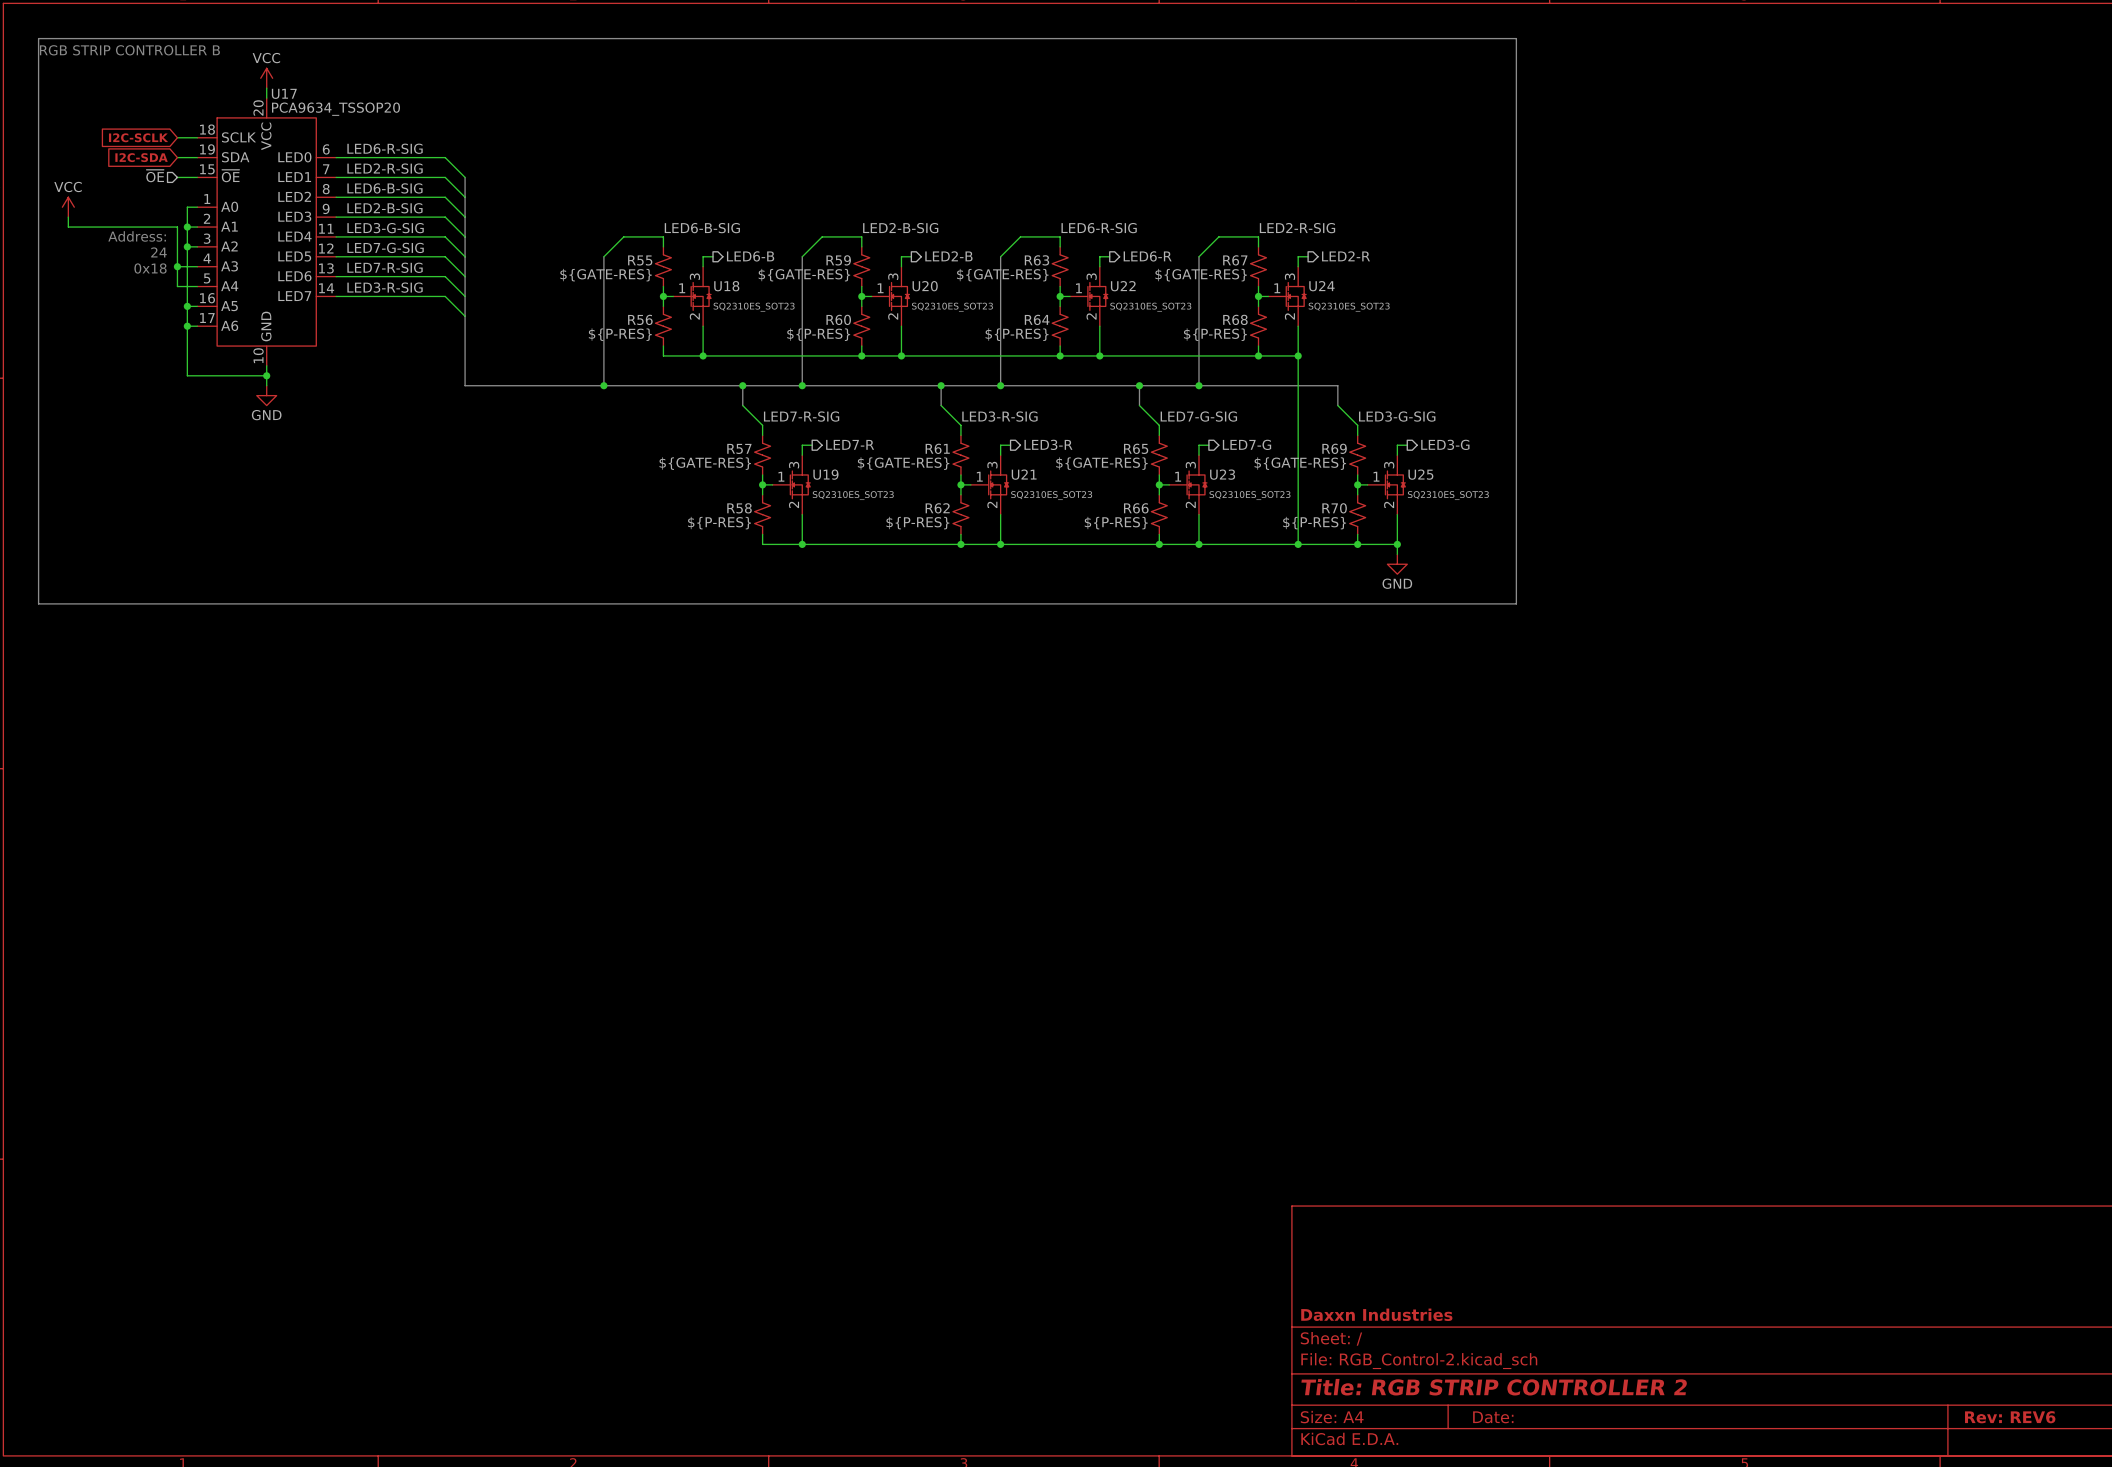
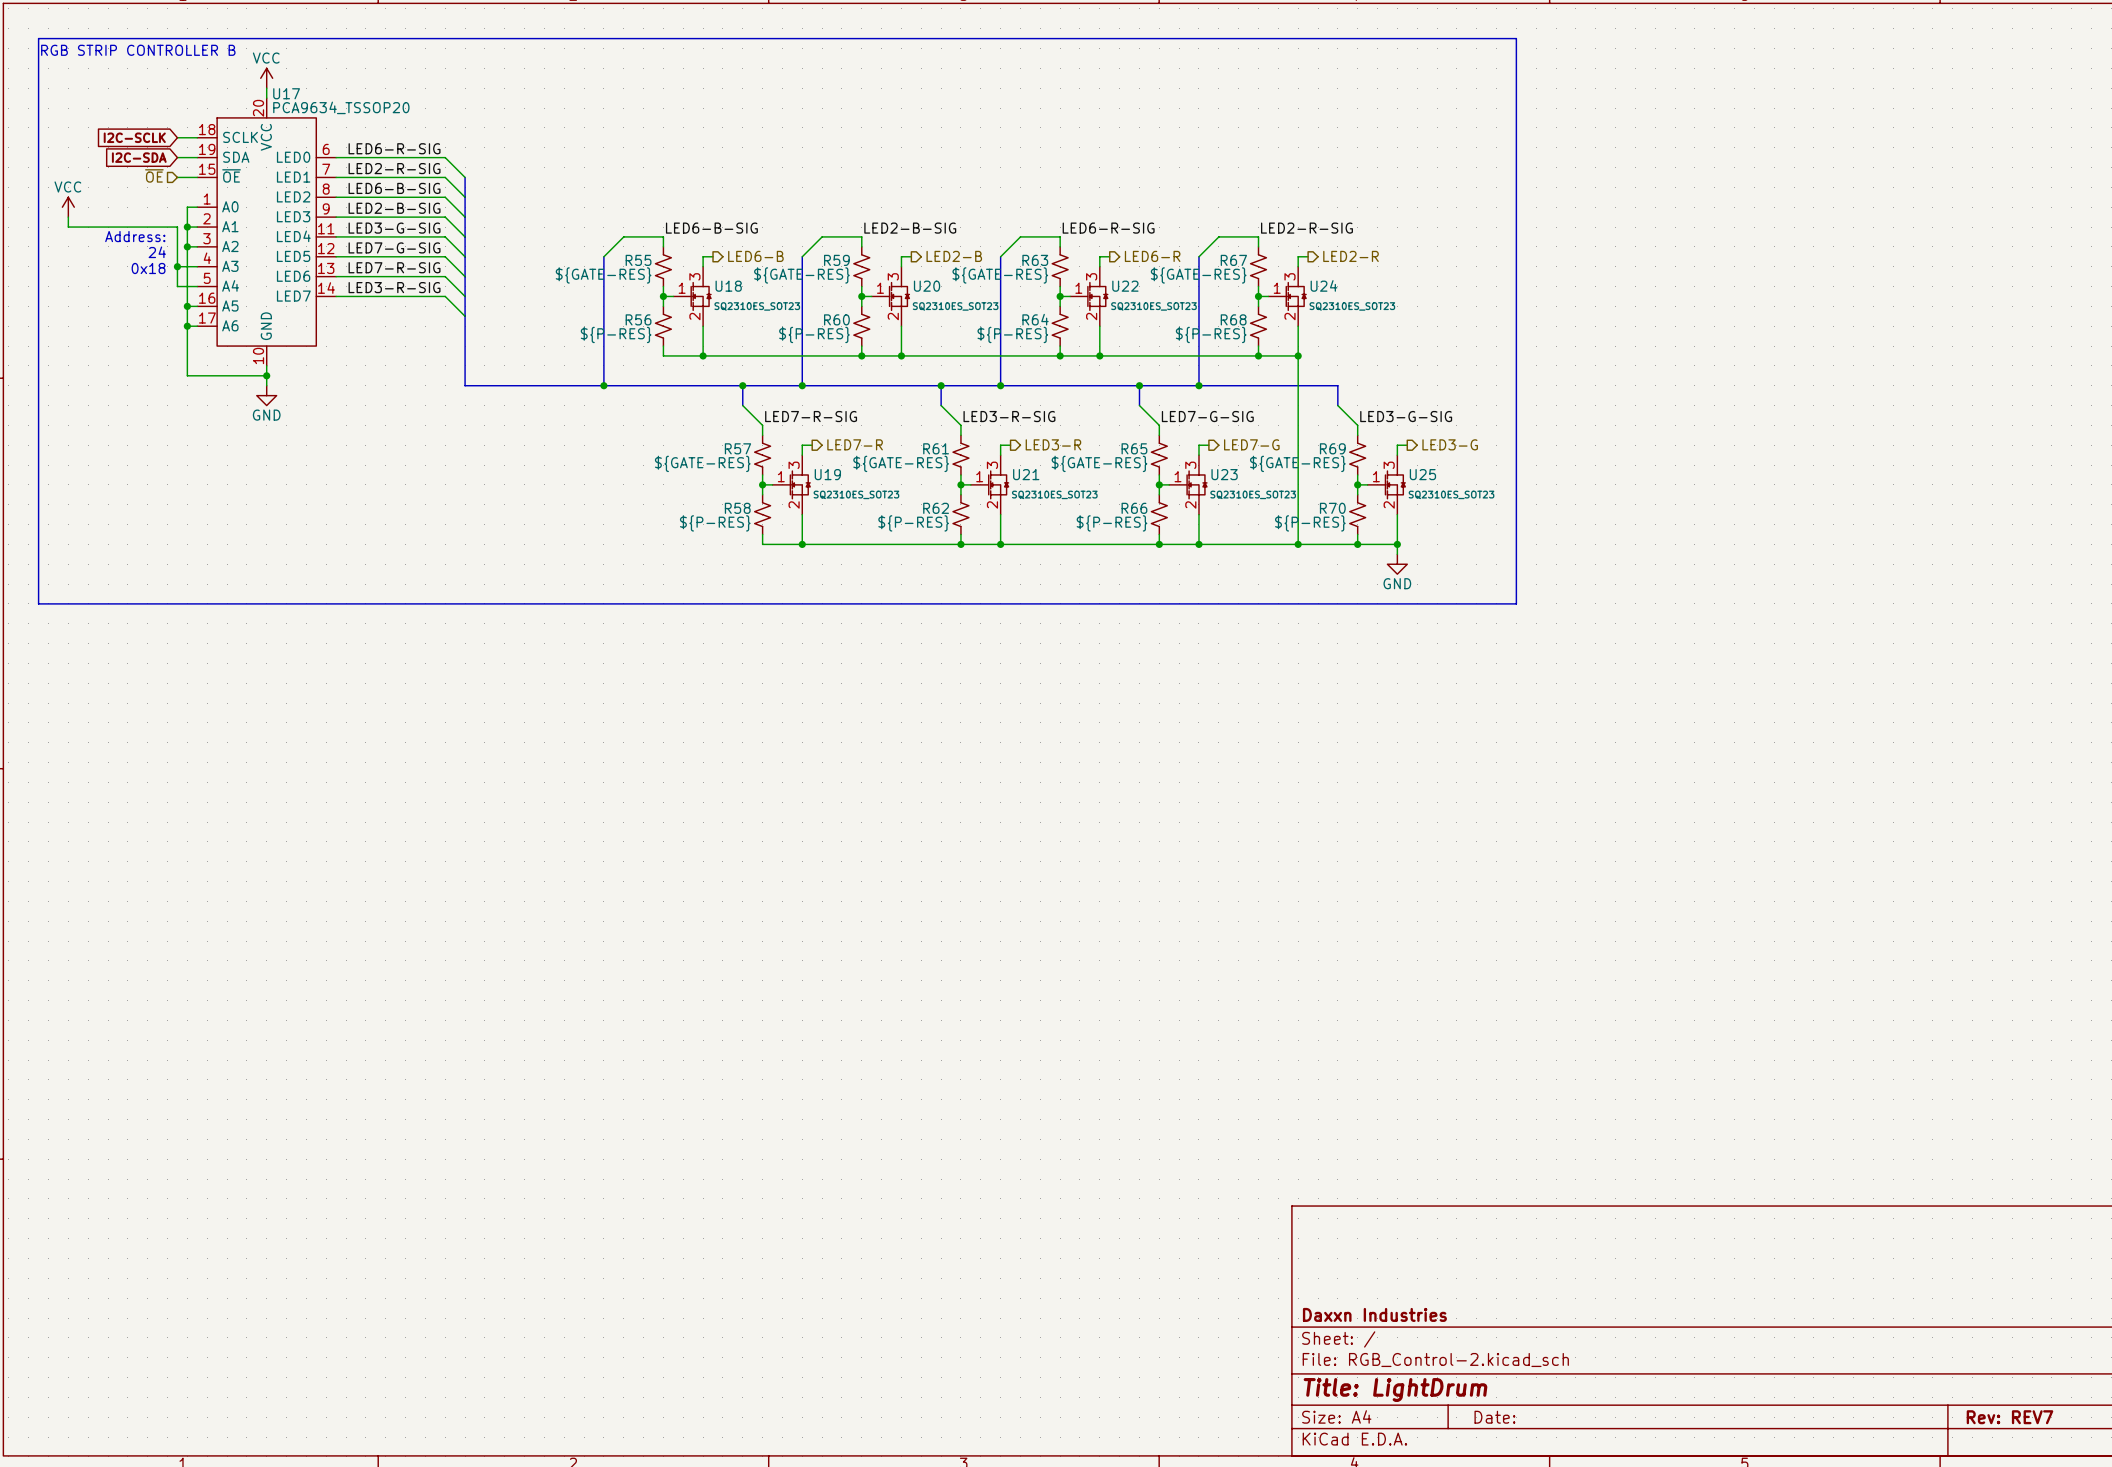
title block: Title: RGB STRIP CONTROLLER 2 (1494, 1387) -> Title: LightDrum (1395, 1390)
title block: Rev: REV6 (2010, 1417) -> Rev: REV7 (2009, 1417)

